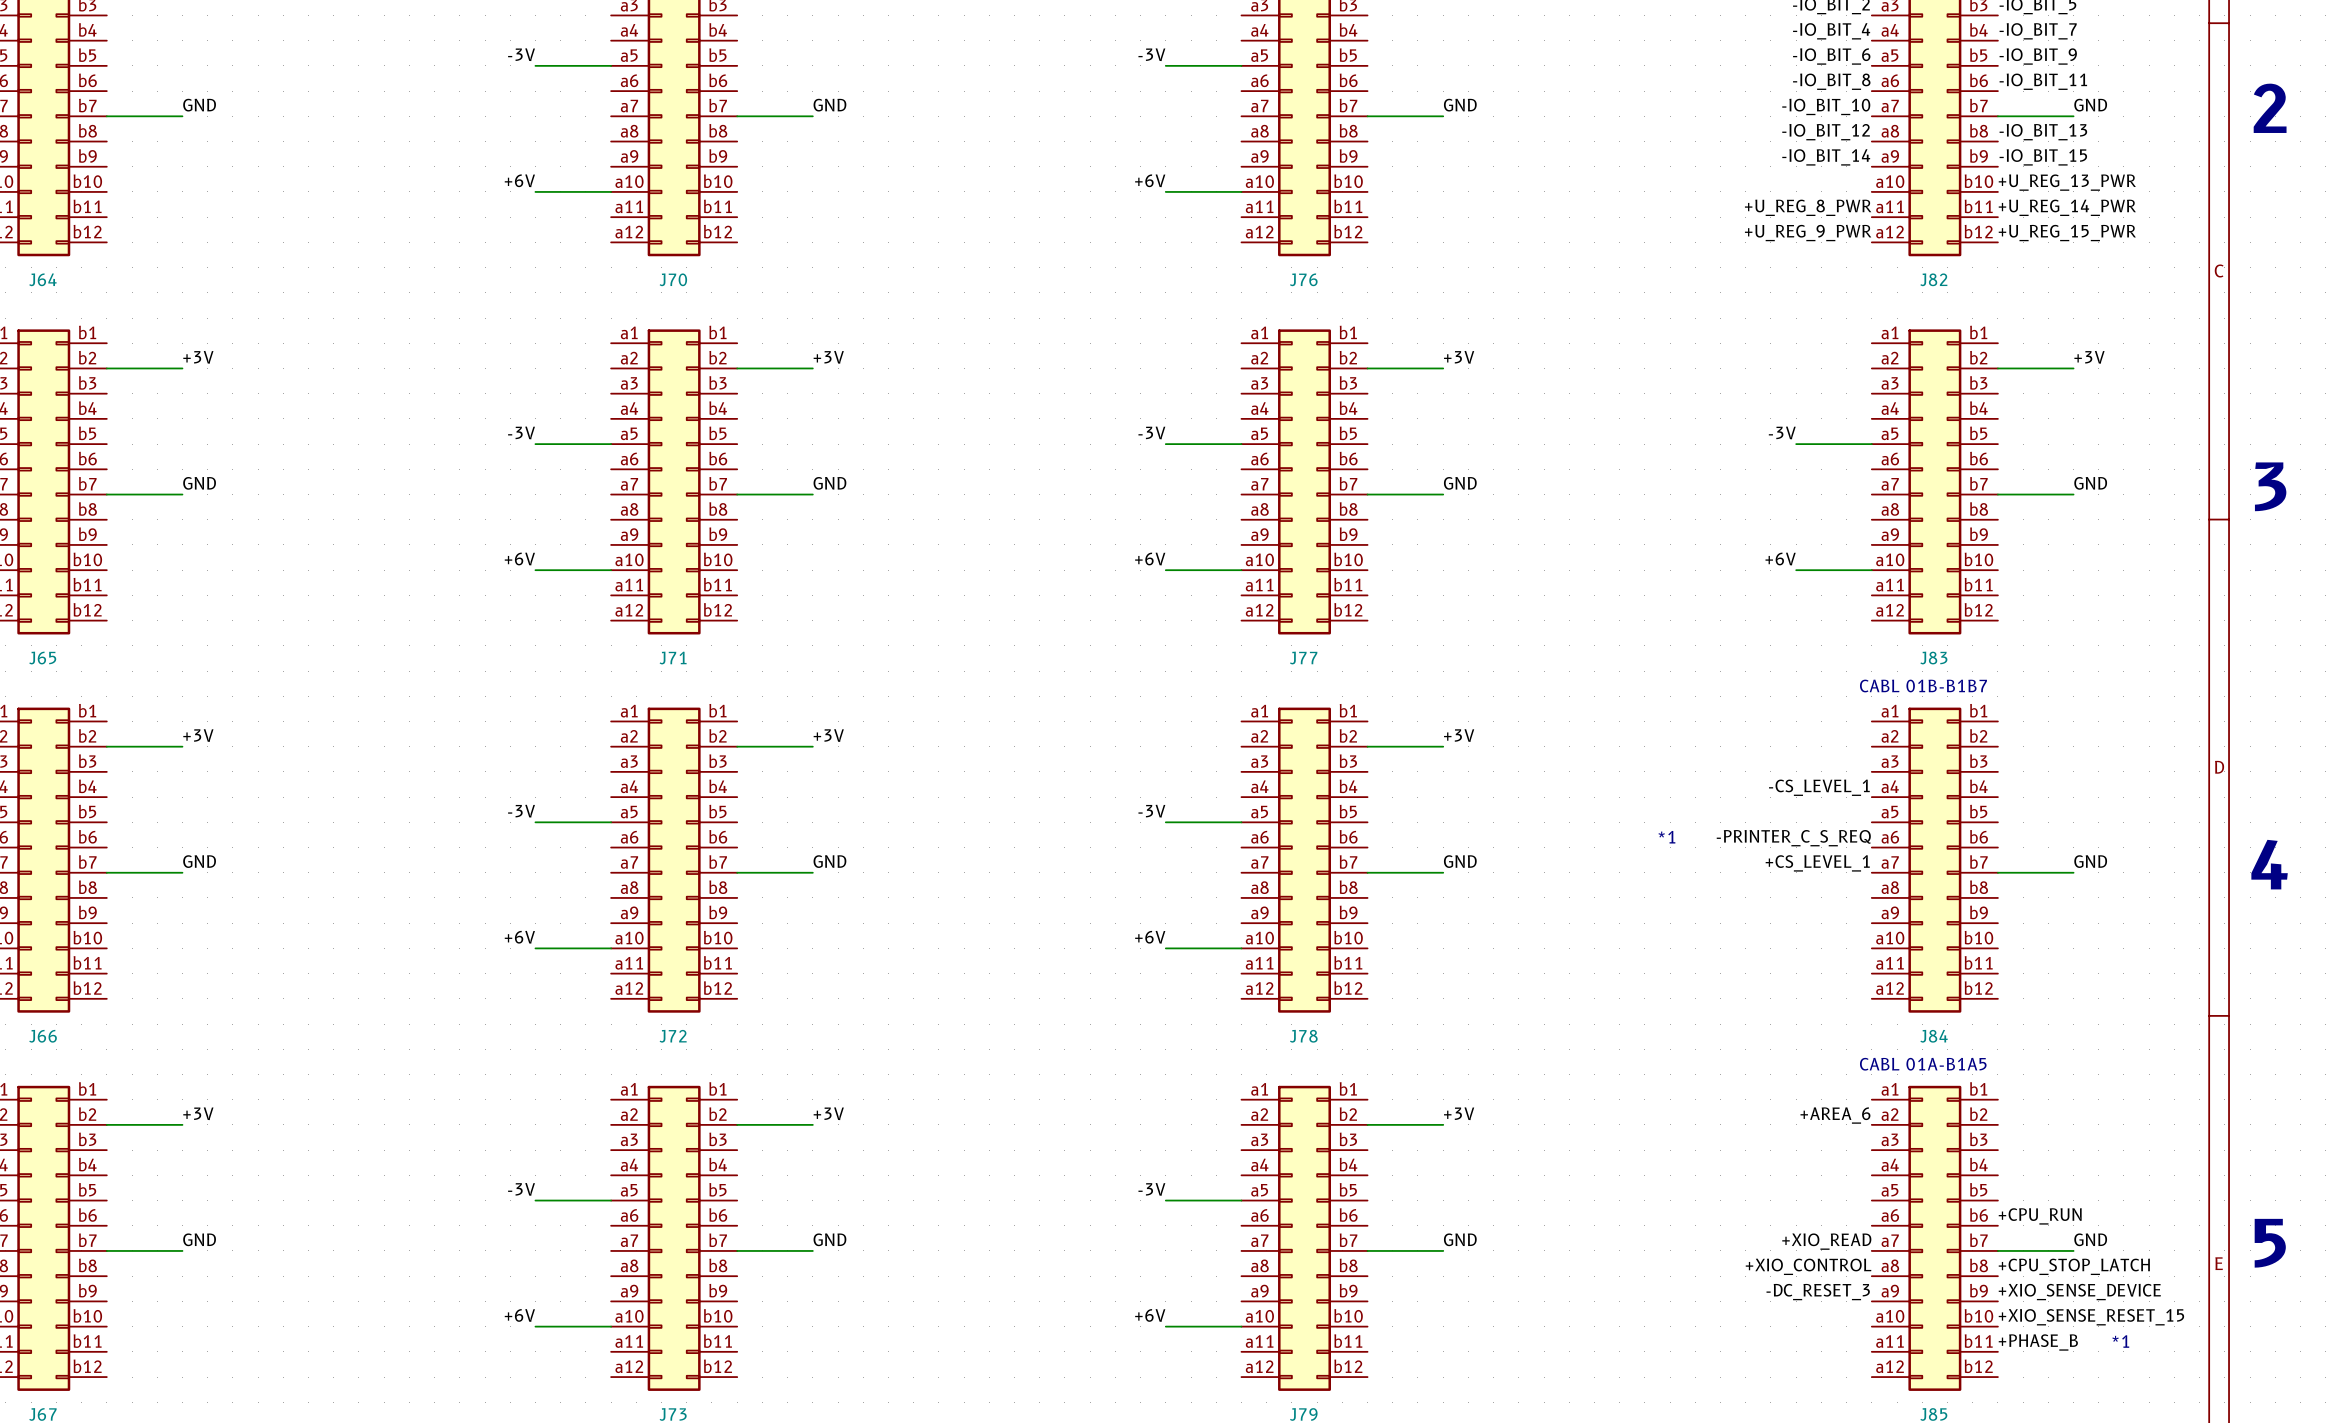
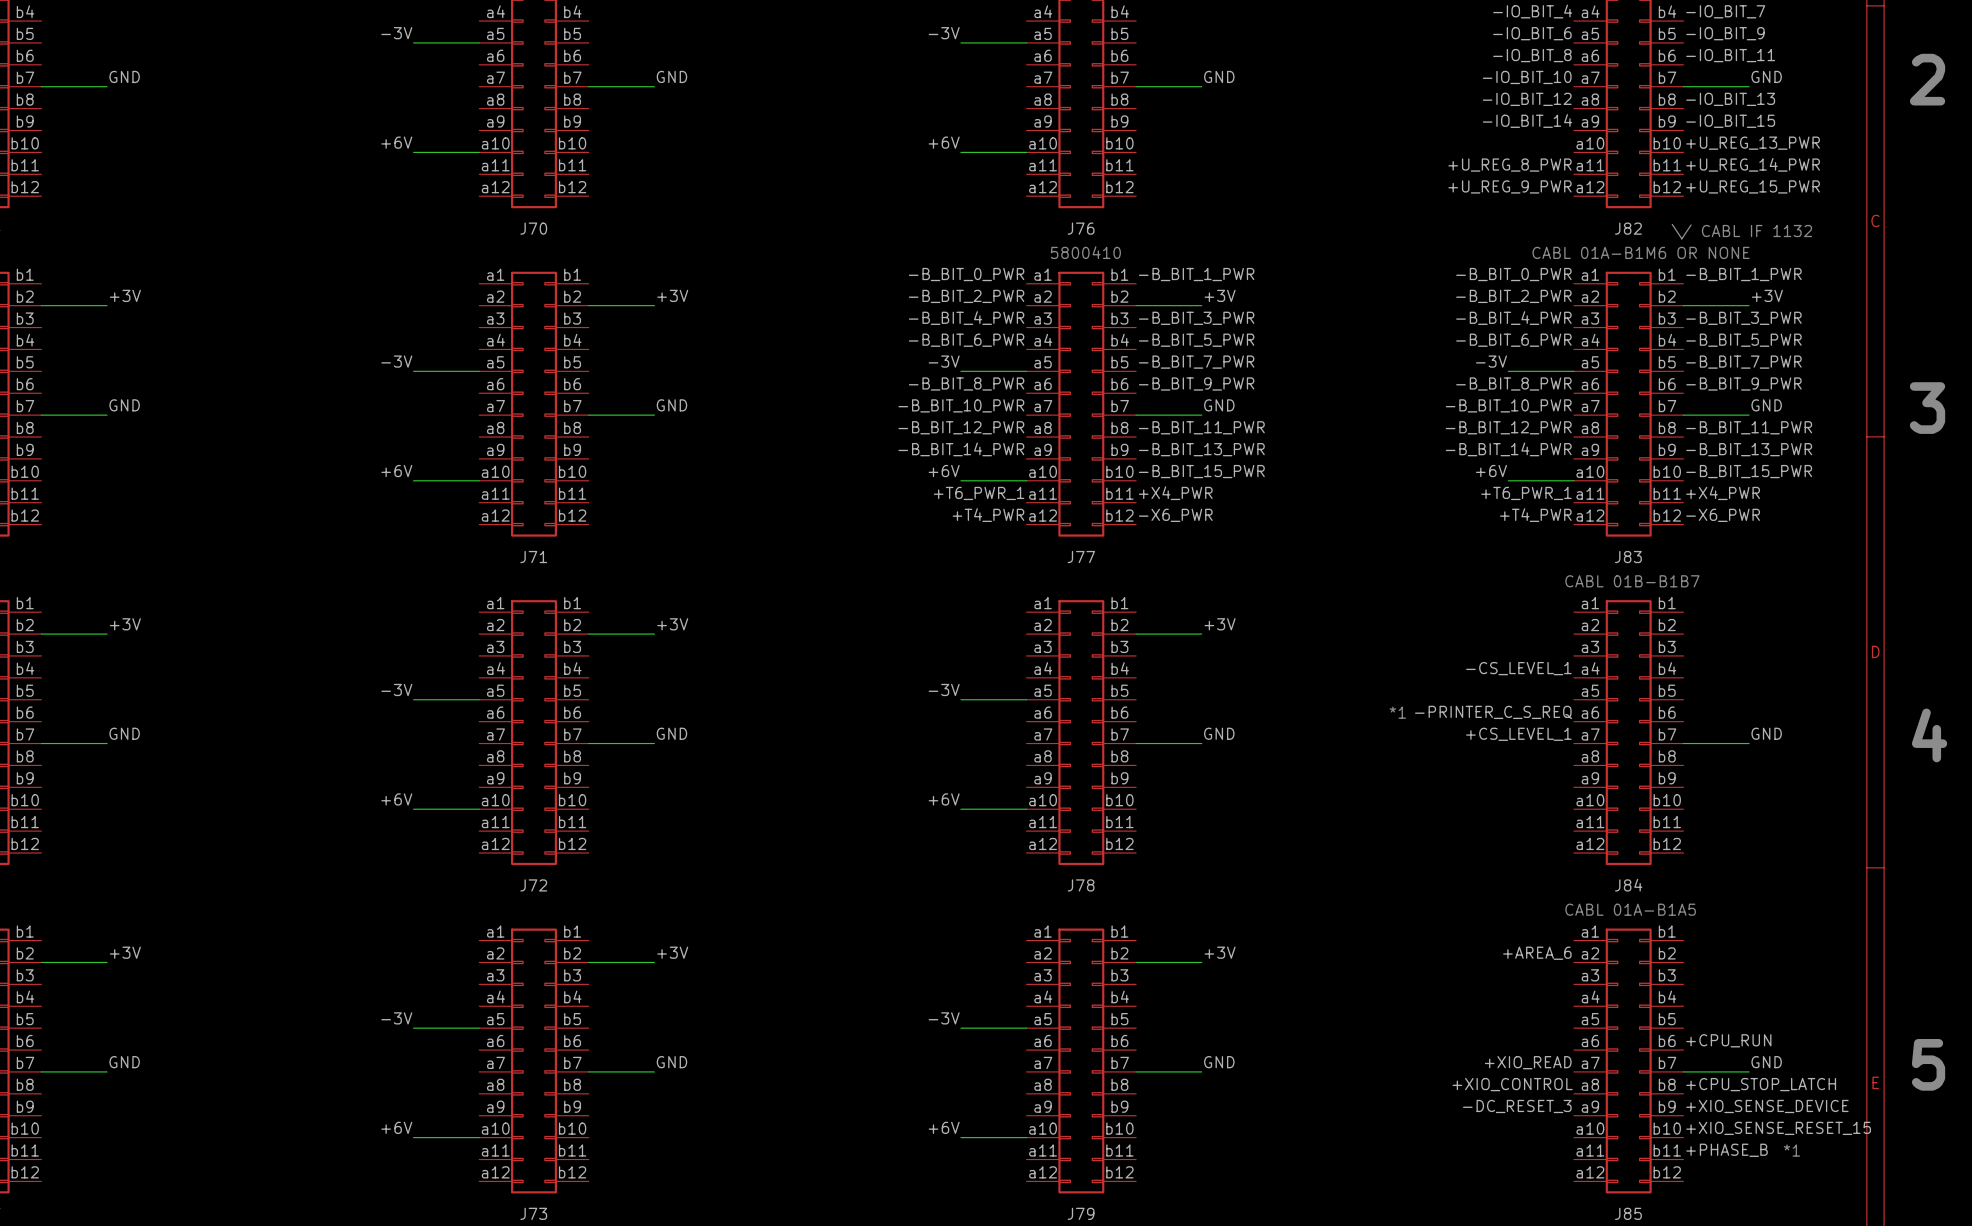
text: none -> \/ CABL IF 1132 (1741, 231)
text: none -> 5800410 (1085, 252)
text: none -> CABL 01A-B1M6 OR NONE (1641, 252)
label: none -> -B_BIT_0_PWR (966, 274)
label: none -> -B_BIT_1_PWR (1196, 274)
label: none -> -B_BIT_0_PWR (1513, 274)
label: none -> -B_BIT_1_PWR (1743, 274)
label: none -> -B_BIT_2_PWR (966, 296)
label: none -> -B_BIT_2_PWR (1513, 296)
label: none -> -B_BIT_4_PWR (966, 318)
label: none -> -B_BIT_3_PWR (1196, 318)
label: none -> -B_BIT_4_PWR (1513, 318)
label: none -> -B_BIT_3_PWR (1743, 318)
label: none -> -B_BIT_6_PWR (966, 340)
label: none -> -B_BIT_5_PWR (1196, 340)
label: none -> -B_BIT_6_PWR (1513, 340)
label: none -> -B_BIT_5_PWR (1743, 340)
label: none -> -B_BIT_7_PWR (1196, 362)
label: none -> -B_BIT_7_PWR (1743, 362)
label: none -> -B_BIT_8_PWR (966, 383)
label: none -> -B_BIT_9_PWR (1196, 383)
label: none -> -B_BIT_8_PWR (1513, 383)
label: none -> -B_BIT_9_PWR (1743, 383)
label: none -> -B_BIT_10_PWR (961, 405)
label: none -> -B_BIT_10_PWR (1508, 405)
label: none -> -B_BIT_12_PWR (961, 427)
label: none -> -B_BIT_11_PWR (1201, 427)
label: none -> -B_BIT_12_PWR (1508, 427)
label: none -> -B_BIT_11_PWR (1749, 427)
label: none -> -B_BIT_14_PWR (961, 449)
label: none -> -B_BIT_13_PWR (1201, 449)
label: none -> -B_BIT_14_PWR (1508, 449)
label: none -> -B_BIT_13_PWR (1749, 449)
label: none -> -B_BIT_15_PWR (1201, 471)
label: none -> -B_BIT_15_PWR (1749, 471)
label: none -> +T6_PWR_1 (979, 493)
label: none -> +X4_PWR (1175, 493)
label: none -> +T6_PWR_1 (1526, 493)
label: none -> +X4_PWR (1723, 493)
label: none -> +T4_PWR (988, 515)
label: none -> -X6_PWR (1175, 515)
label: none -> +T4_PWR (1535, 515)
label: none -> -X6_PWR (1723, 515)

